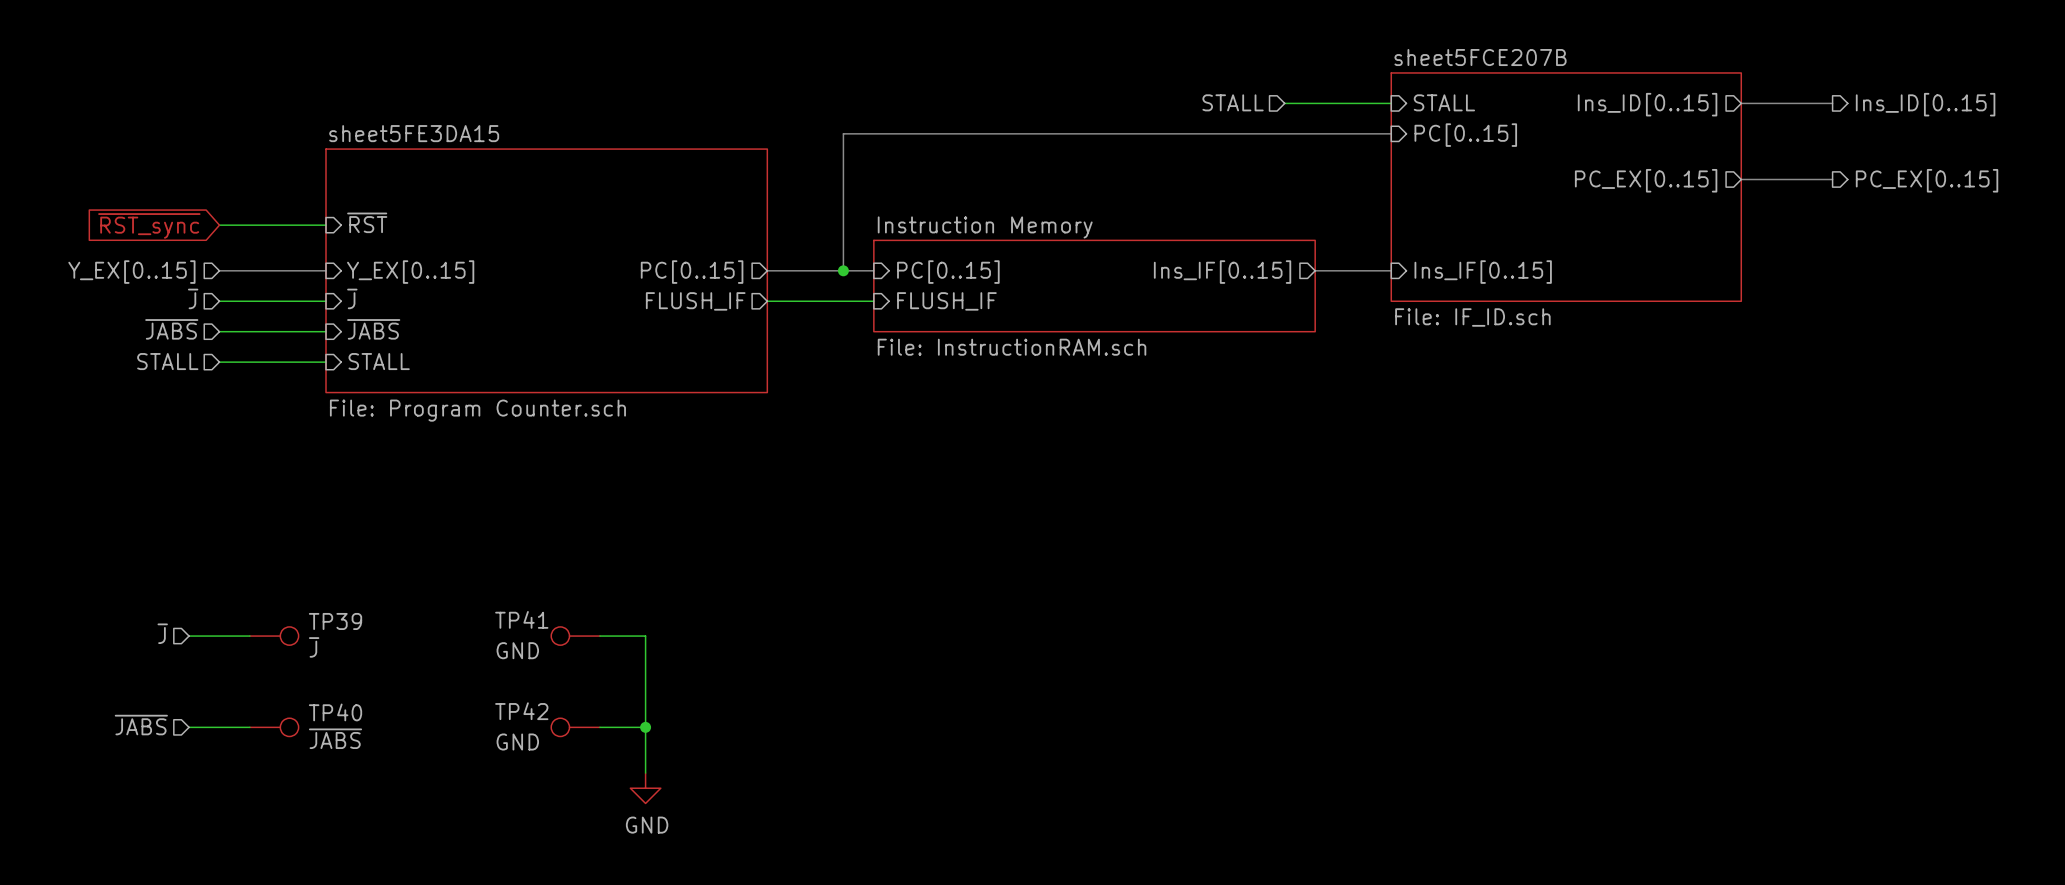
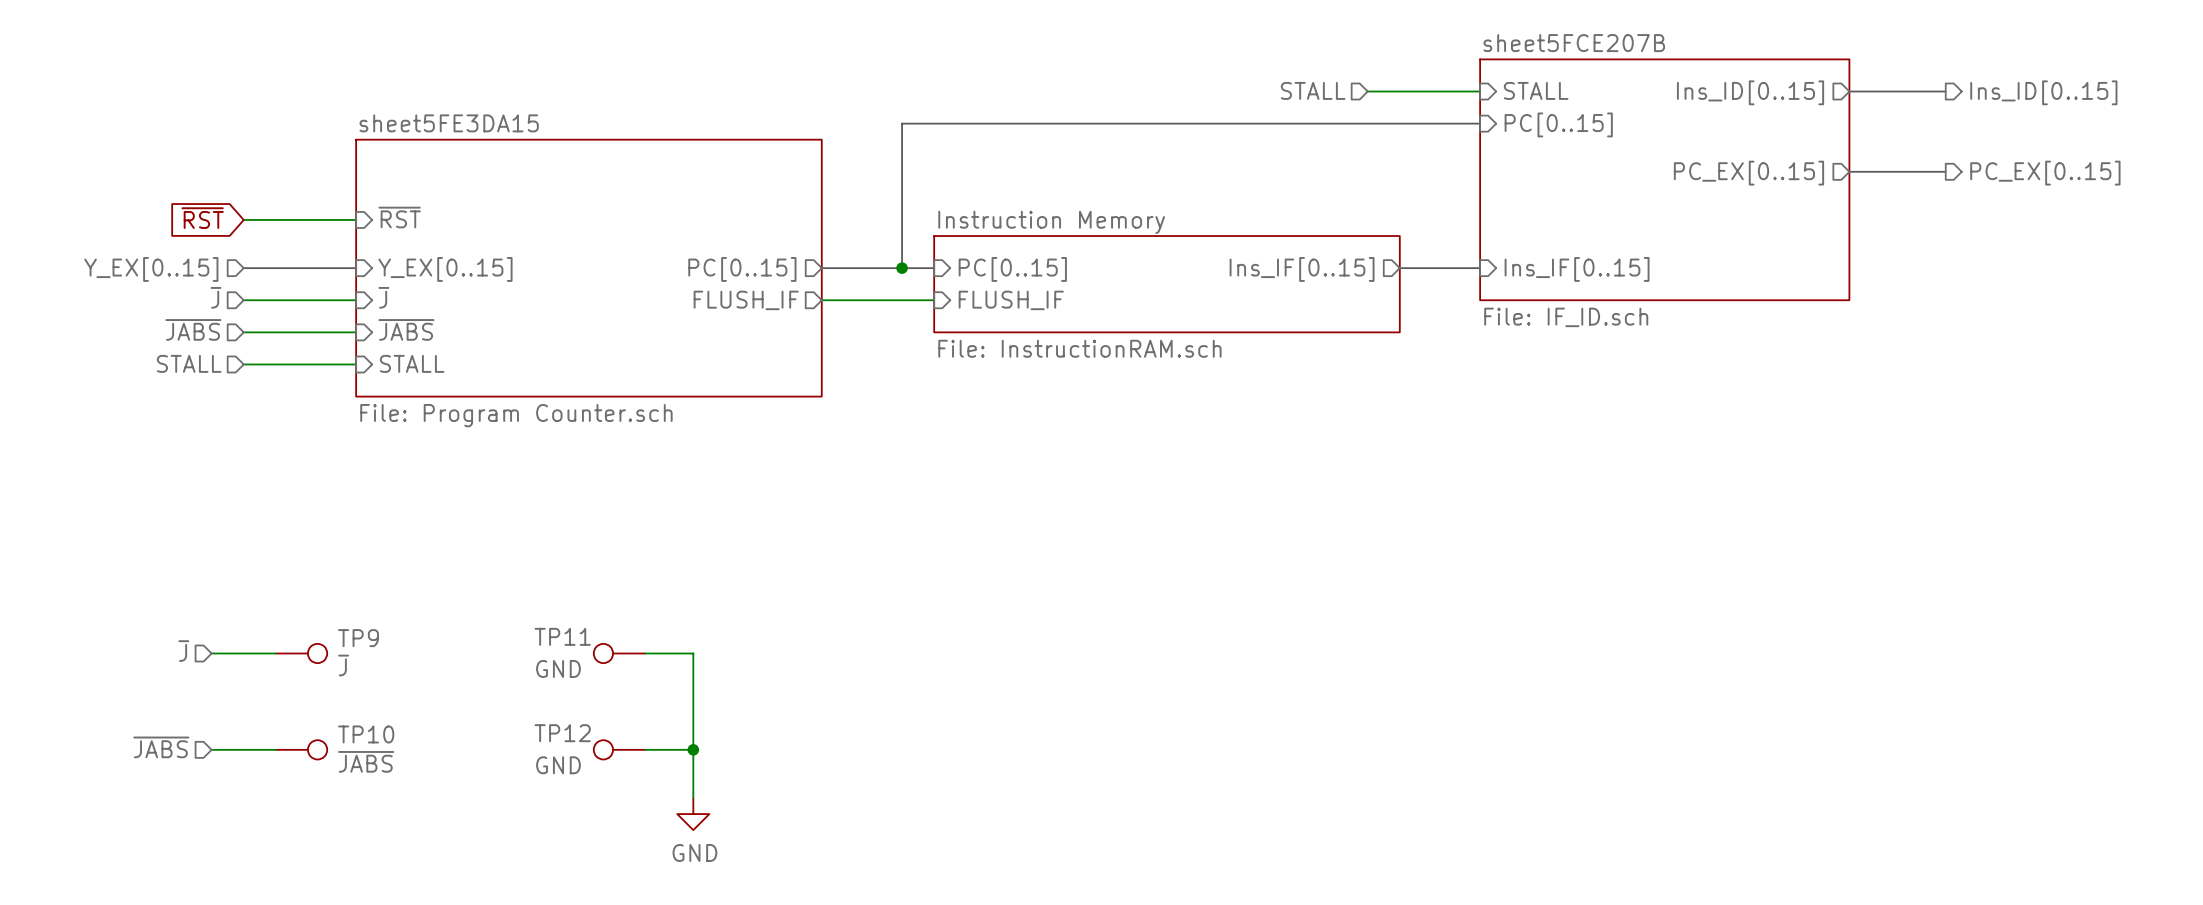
global label: ~{RST_sync} (149, 225) -> ~{RST} (202, 218)
TP41 name: TP41 (521, 619) -> TP11 (562, 636)
TP39 name: TP39 (335, 621) -> TP9 (358, 638)
TP42 name: TP42 (521, 711) -> TP12 (562, 733)
TP40 name: TP40 (335, 712) -> TP10 (366, 734)

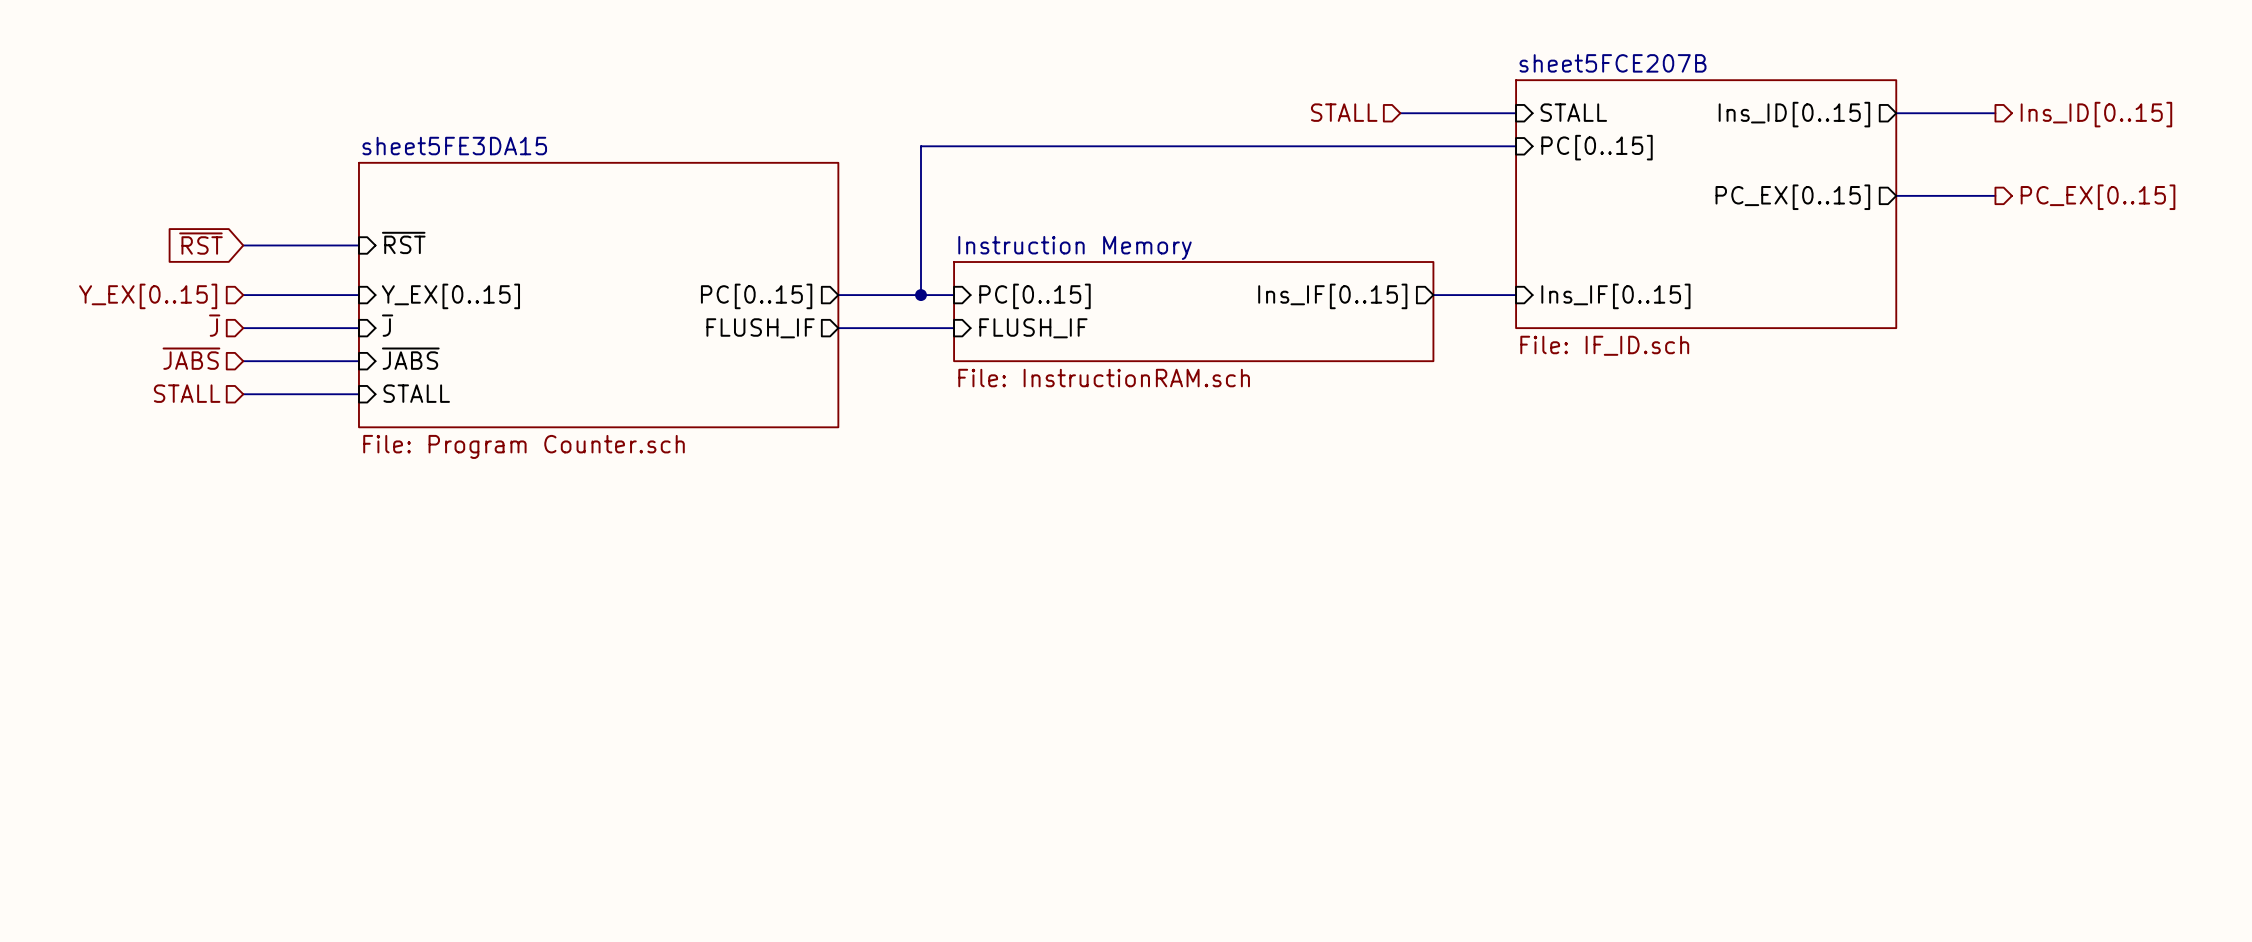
hierarchical label: ~{J} (183, 651) -> none
wire: (211, 653) (275, 653) -> none
TP9: ~{J} (301, 653) -> none
TP11: GND (619, 653) -> none
wire: (645, 653) (693, 653) (693, 798) -> none
hierarchical label: ~{JABS} (161, 747) -> none
wire: (211, 749) (275, 749) -> none
TP10: ~{JABS} (301, 749) -> none
TP12: GND (619, 749) -> none
wire: (645, 749) (693, 749) -> none
junction: (693, 749) -> none
power symbol: GND (693, 814) -> none

